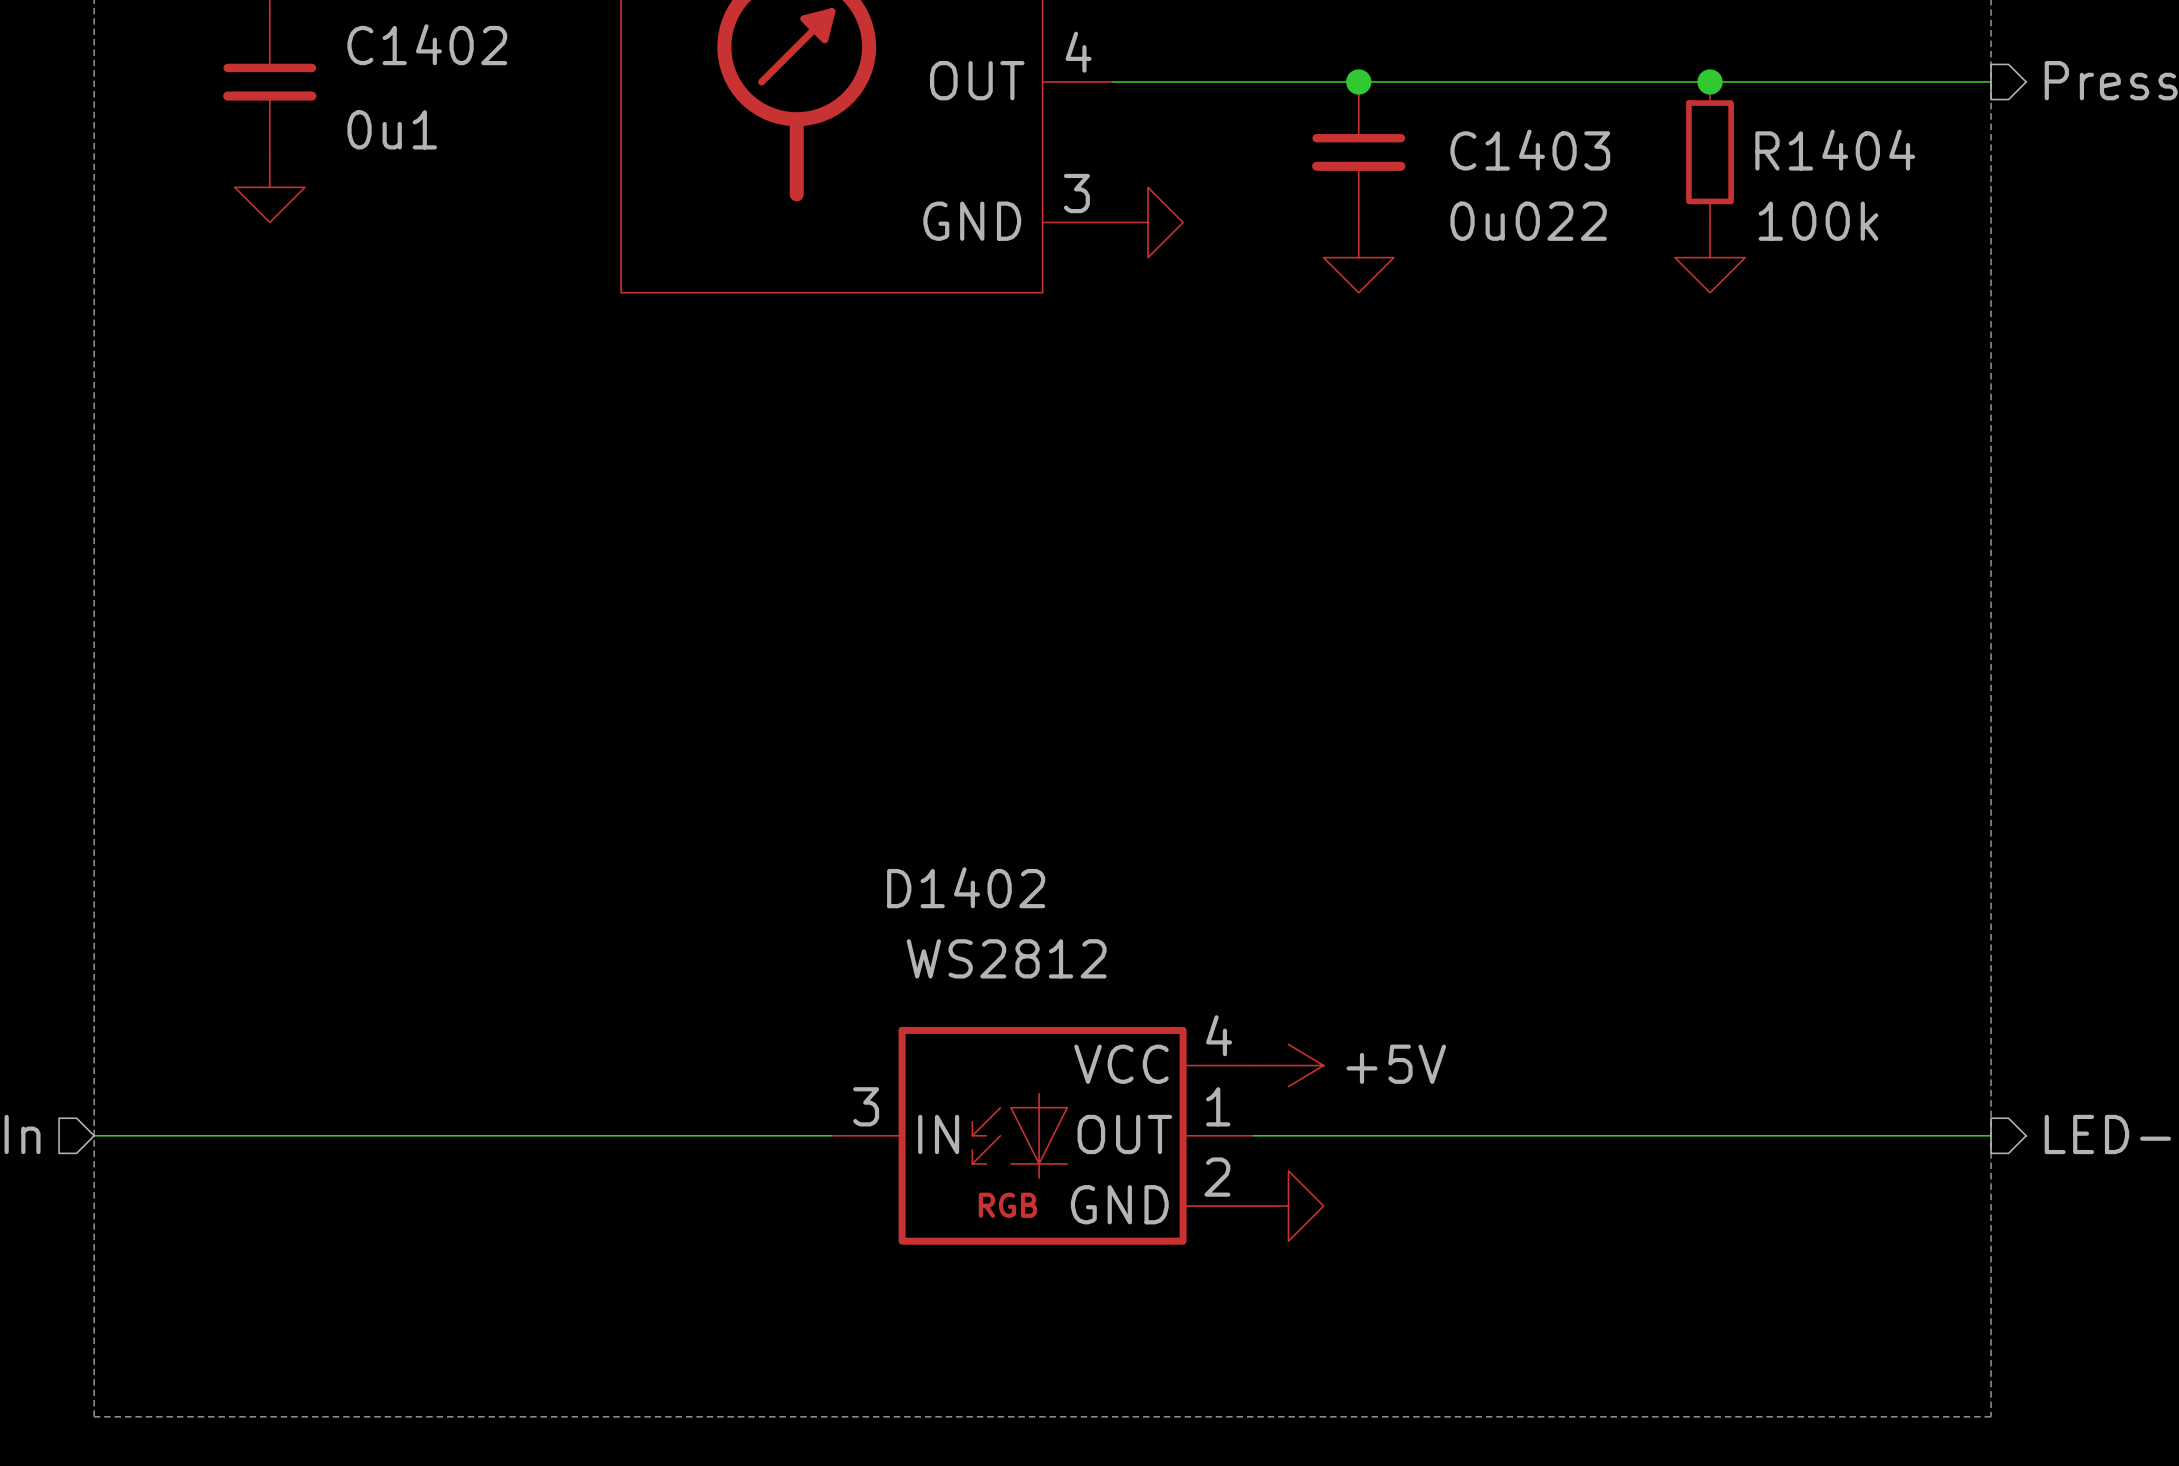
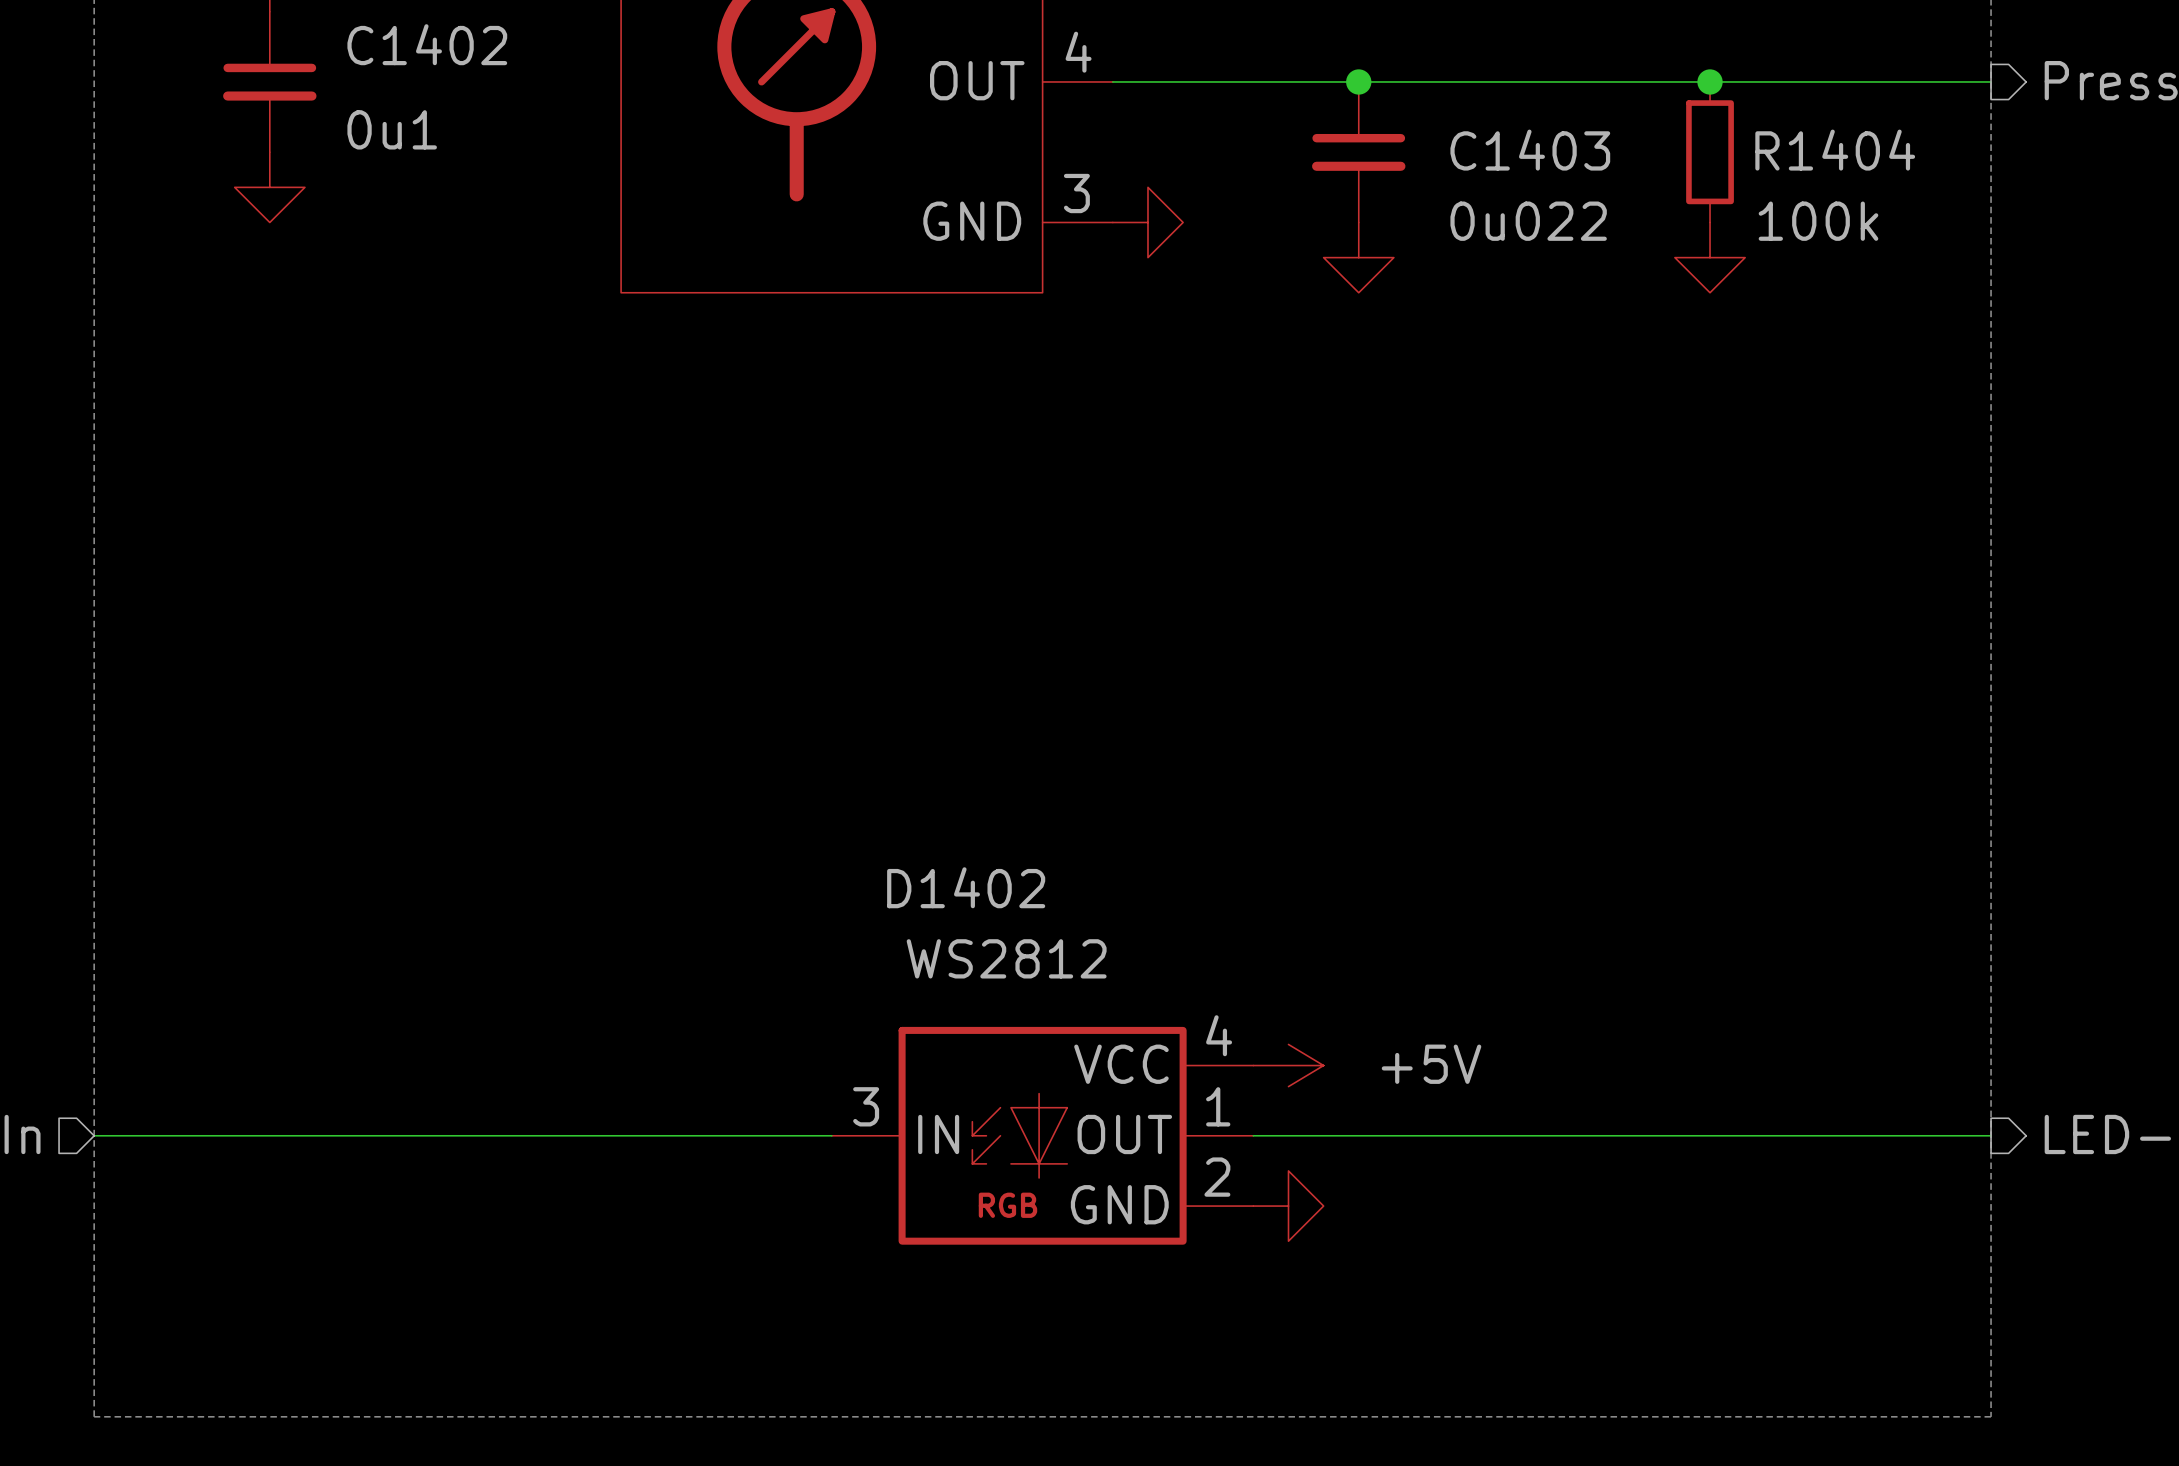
power symbol text position: +5V (1396, 1064) -> +5V (1431, 1064)

